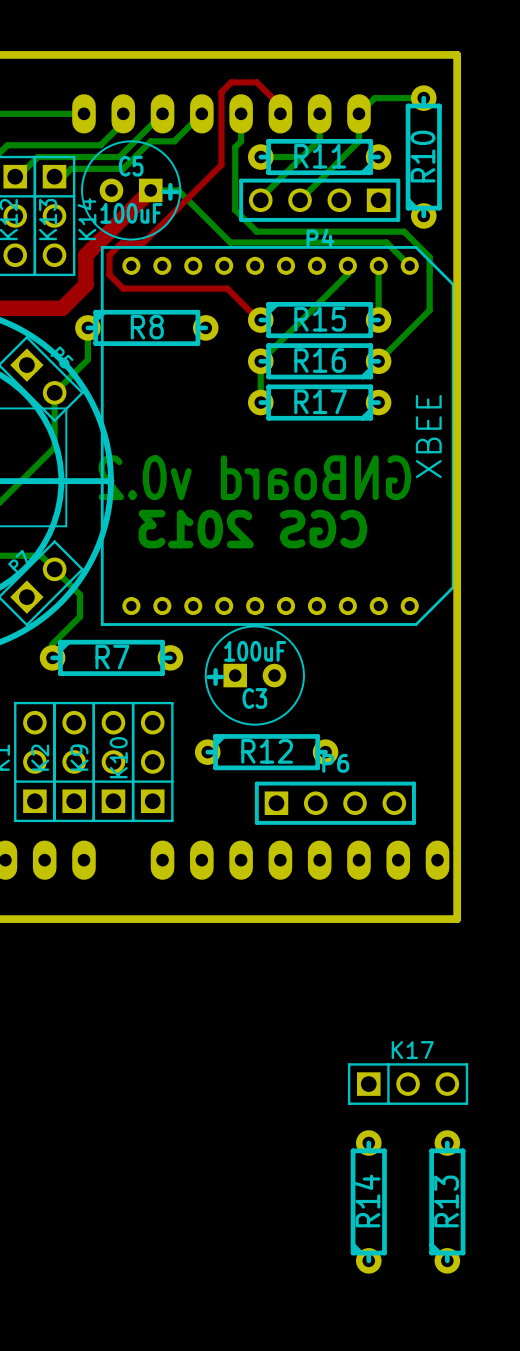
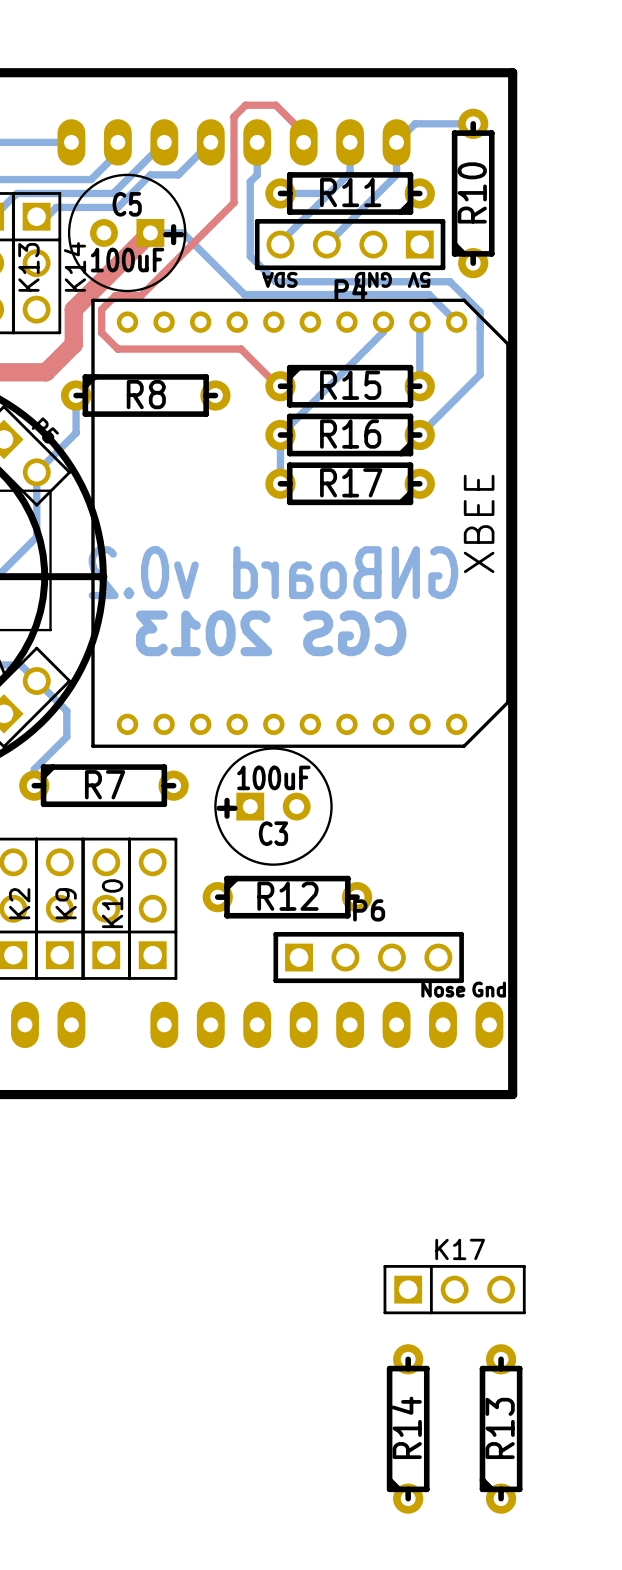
text: none -> SDA (279, 279)
text: none -> GND (373, 279)
text: none -> 5V (419, 279)
text: none -> Nose (443, 989)
text: none -> Gnd (489, 989)

